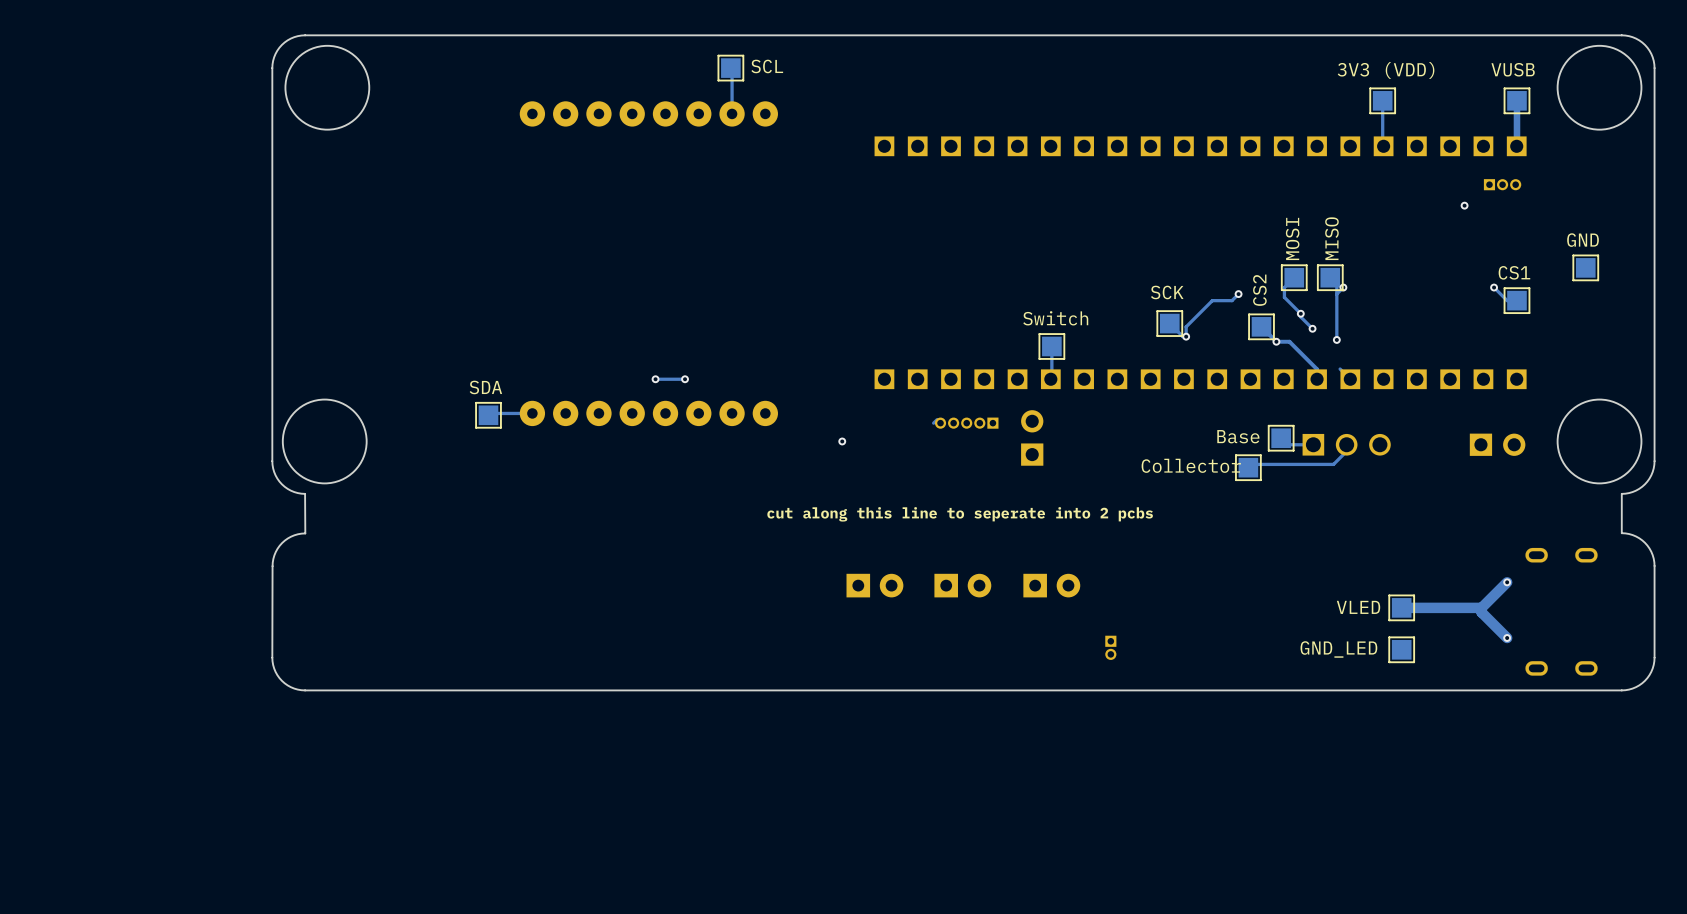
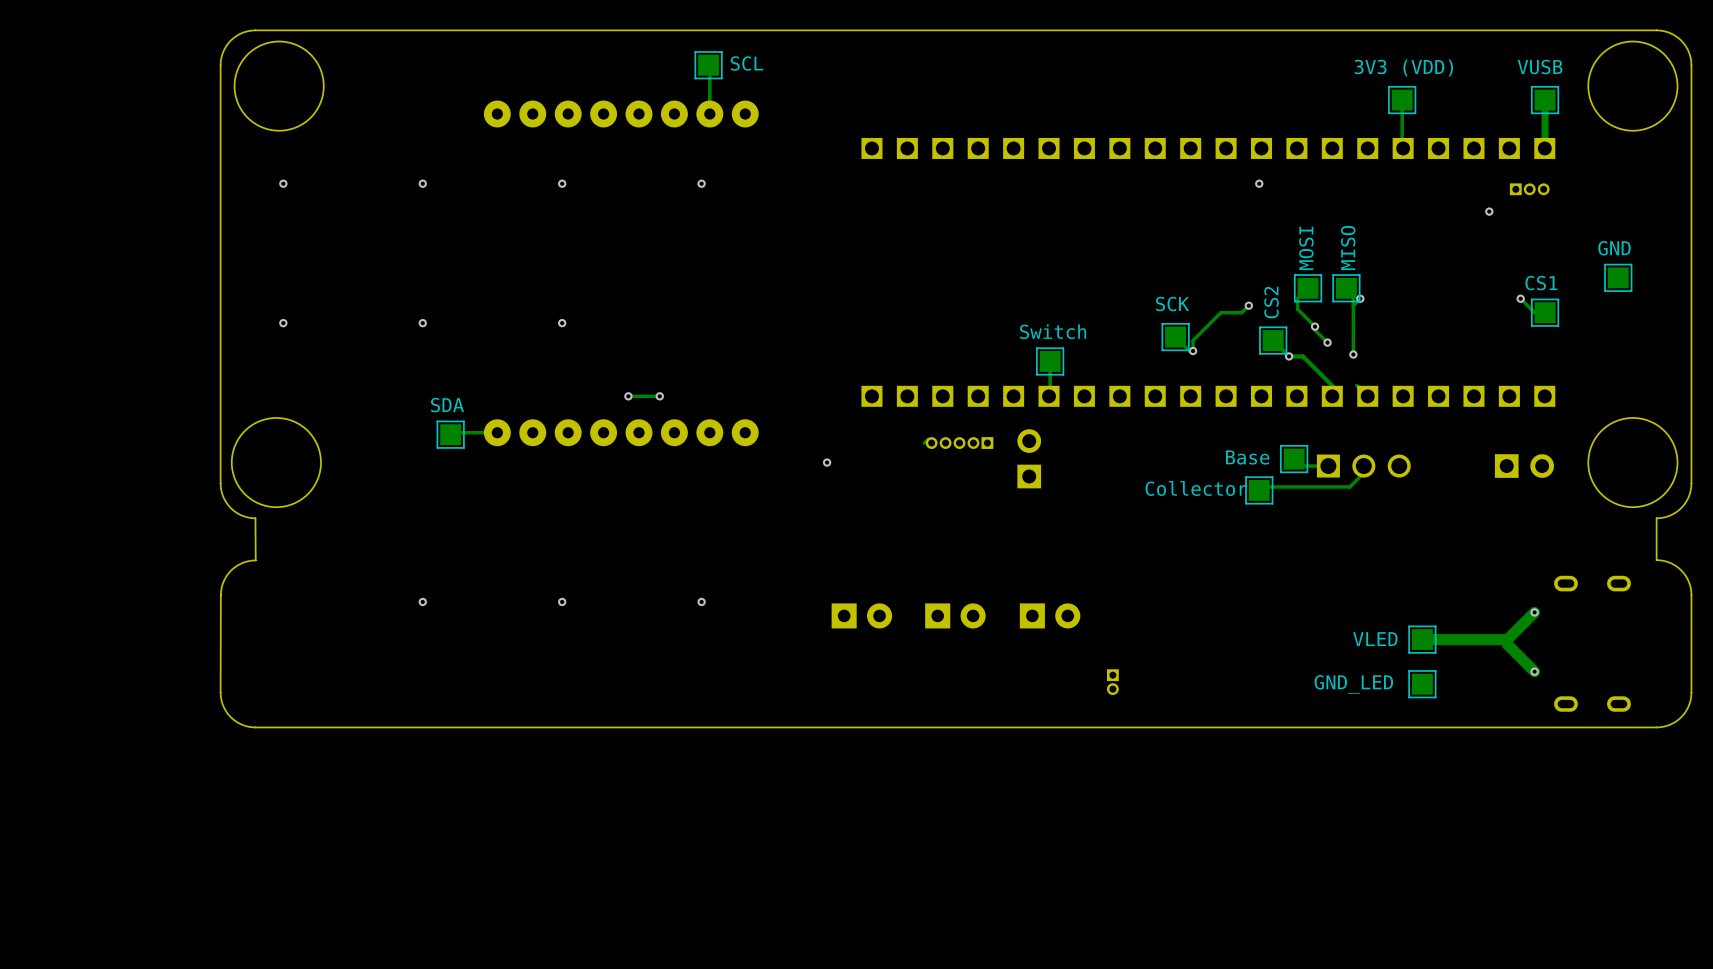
via: none -> (283, 183)
via: none -> (422, 183)
via: none -> (562, 183)
via: none -> (701, 183)
via: none -> (1259, 183)
via: none -> (283, 323)
via: none -> (422, 323)
via: none -> (562, 323)
text: cut along this line to seperate into 2 pcbs (960, 514) -> none
via: none -> (422, 601)
via: none -> (562, 601)
via: none -> (701, 601)

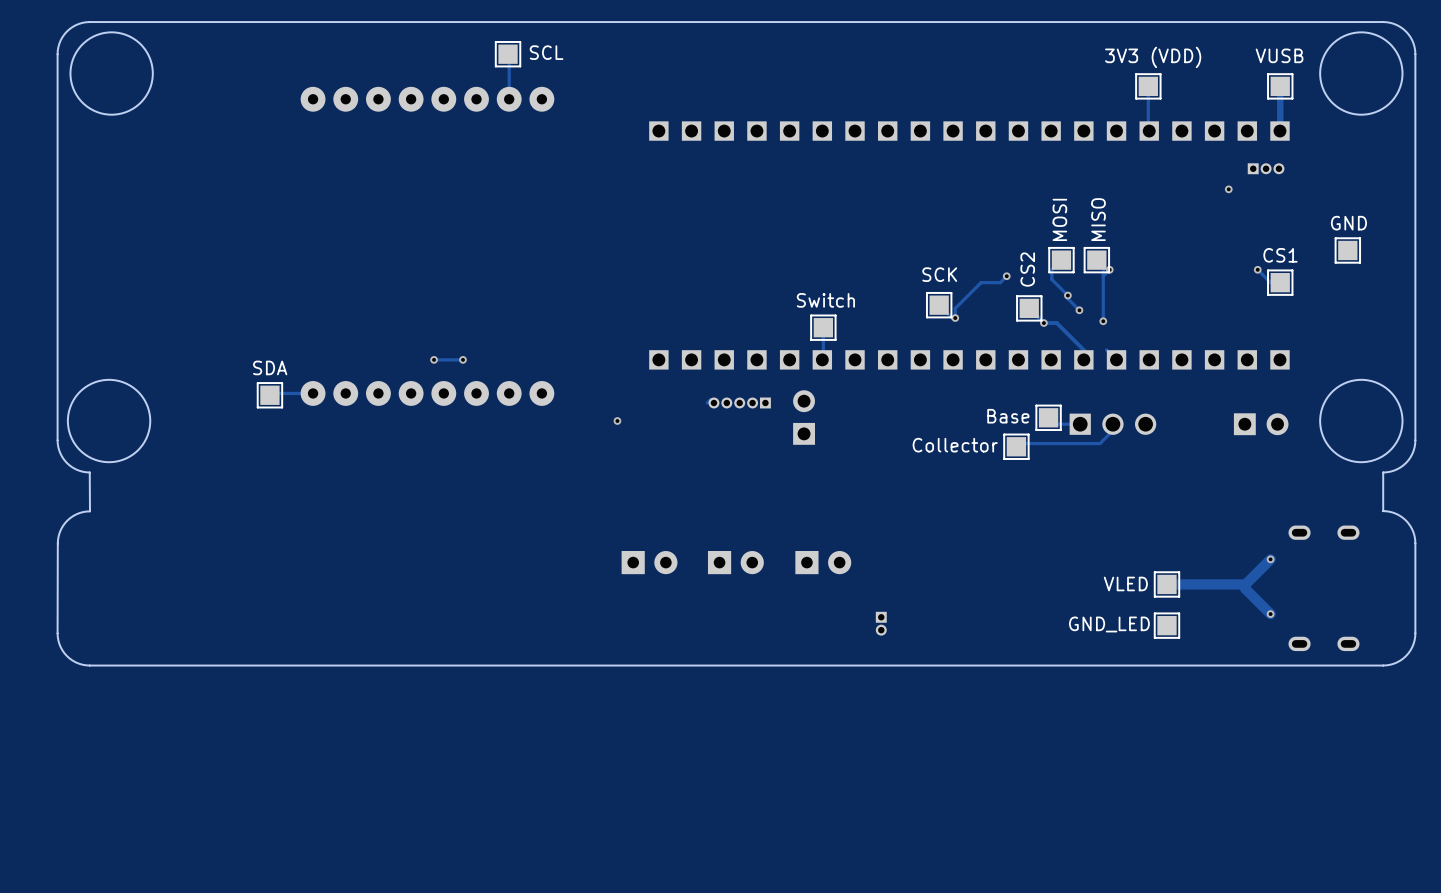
via: (283, 183) -> none
via: (422, 183) -> none
via: (562, 183) -> none
via: (701, 183) -> none
via: (1259, 183) -> none
via: (283, 323) -> none
via: (422, 323) -> none
via: (562, 323) -> none
via: (422, 601) -> none
via: (562, 601) -> none
via: (701, 601) -> none

